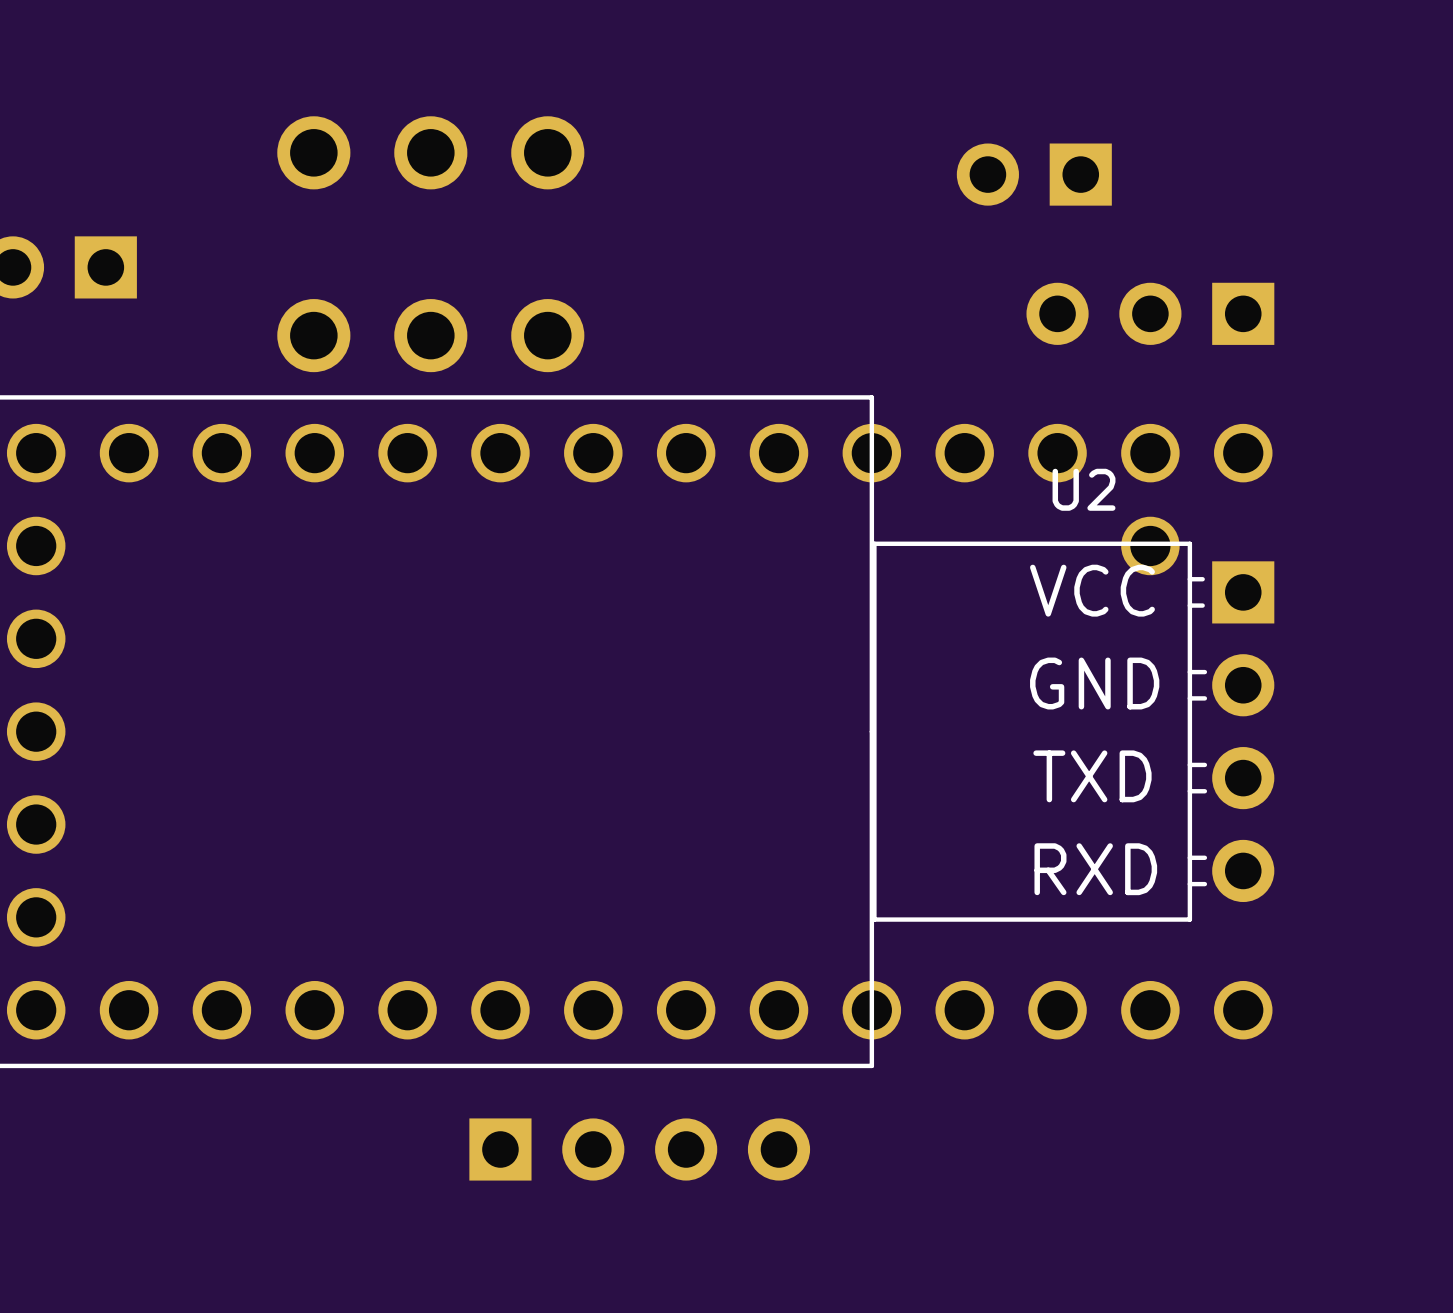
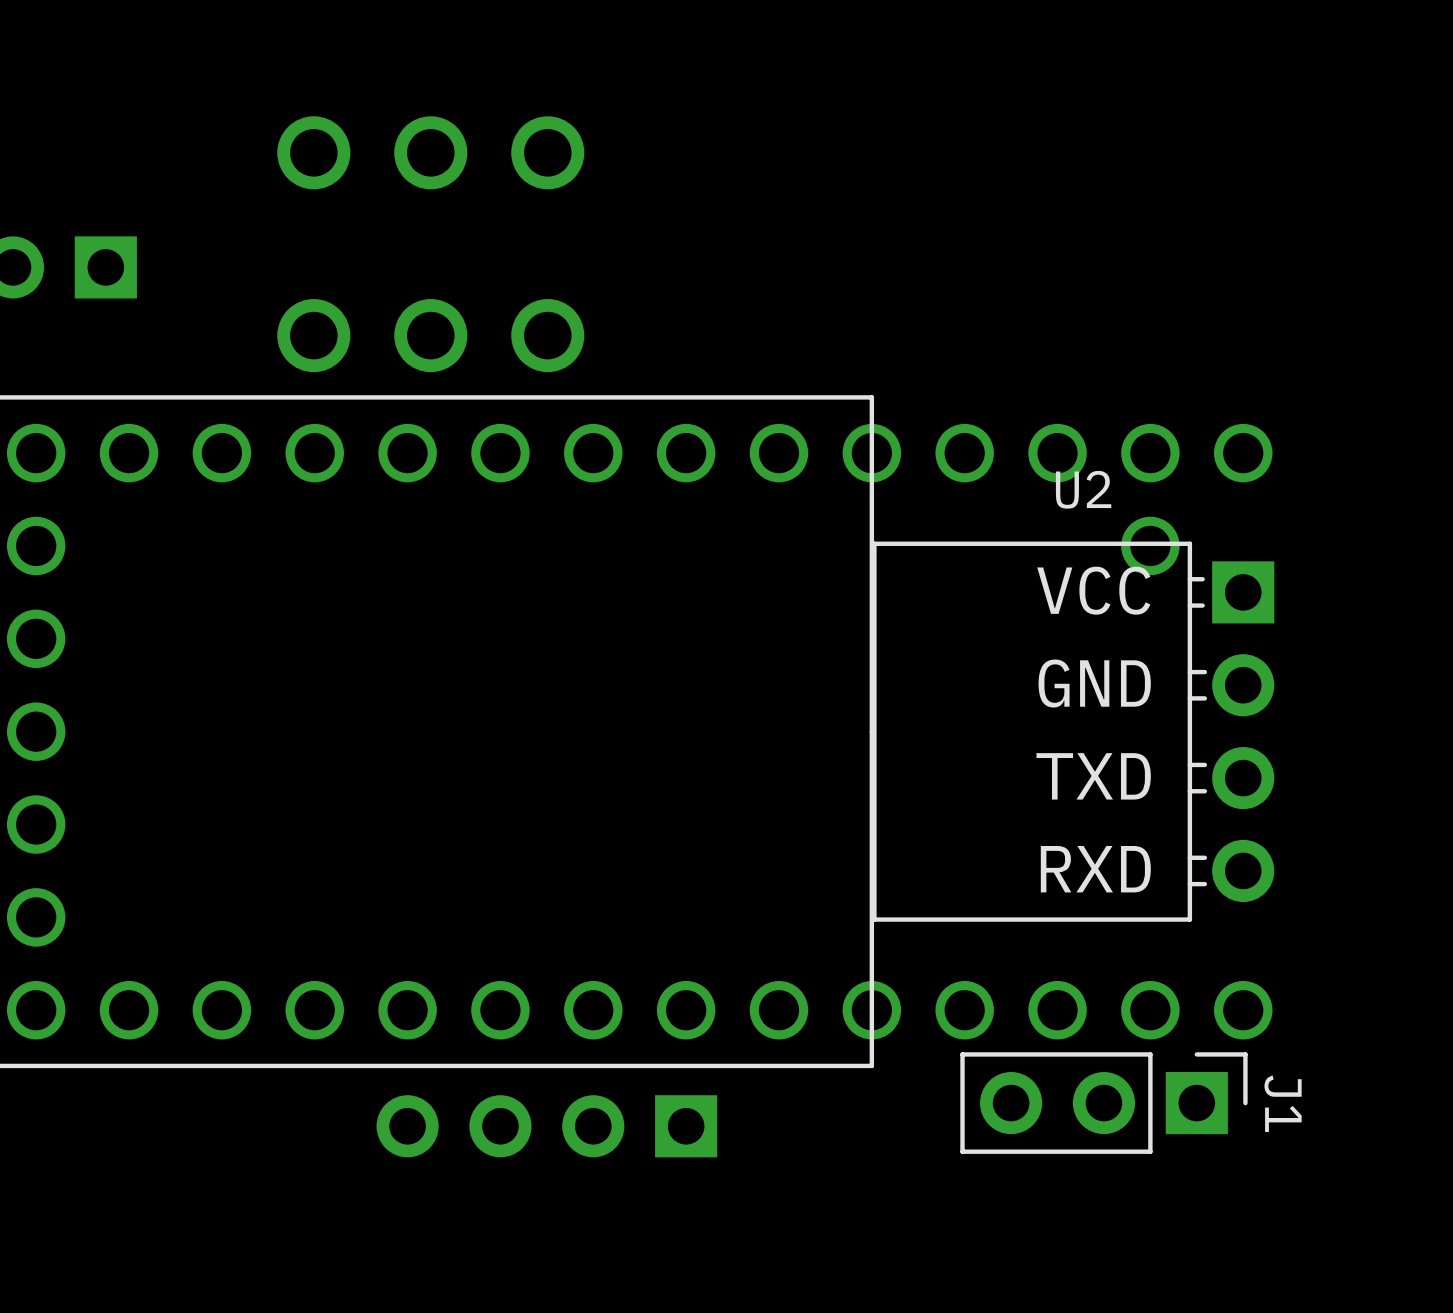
part: (1034, 174) -> none
J1 side: top (1150, 313) -> bottom (1103, 1103)
part rotation: 0° (639, 1149) -> 180° (546, 1126)

